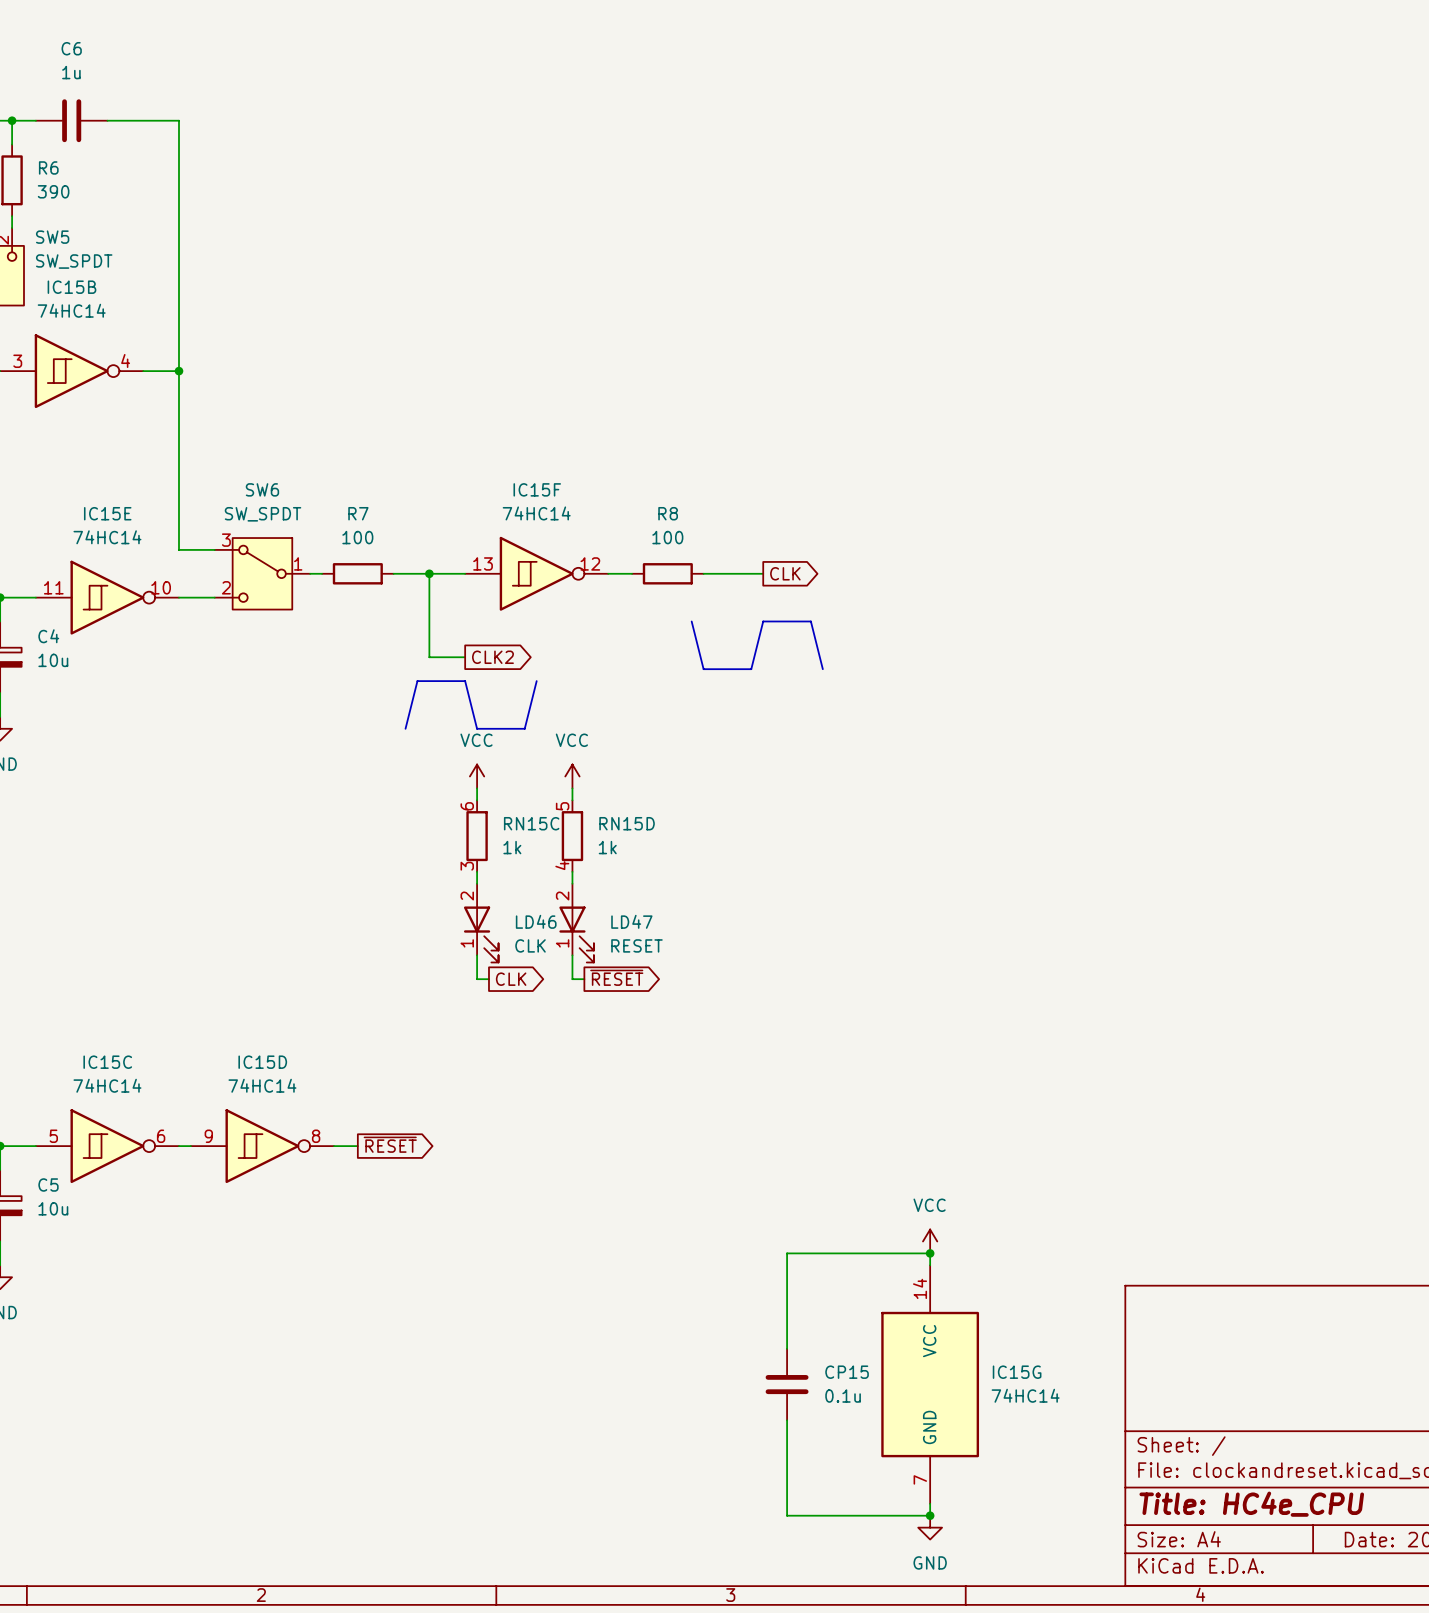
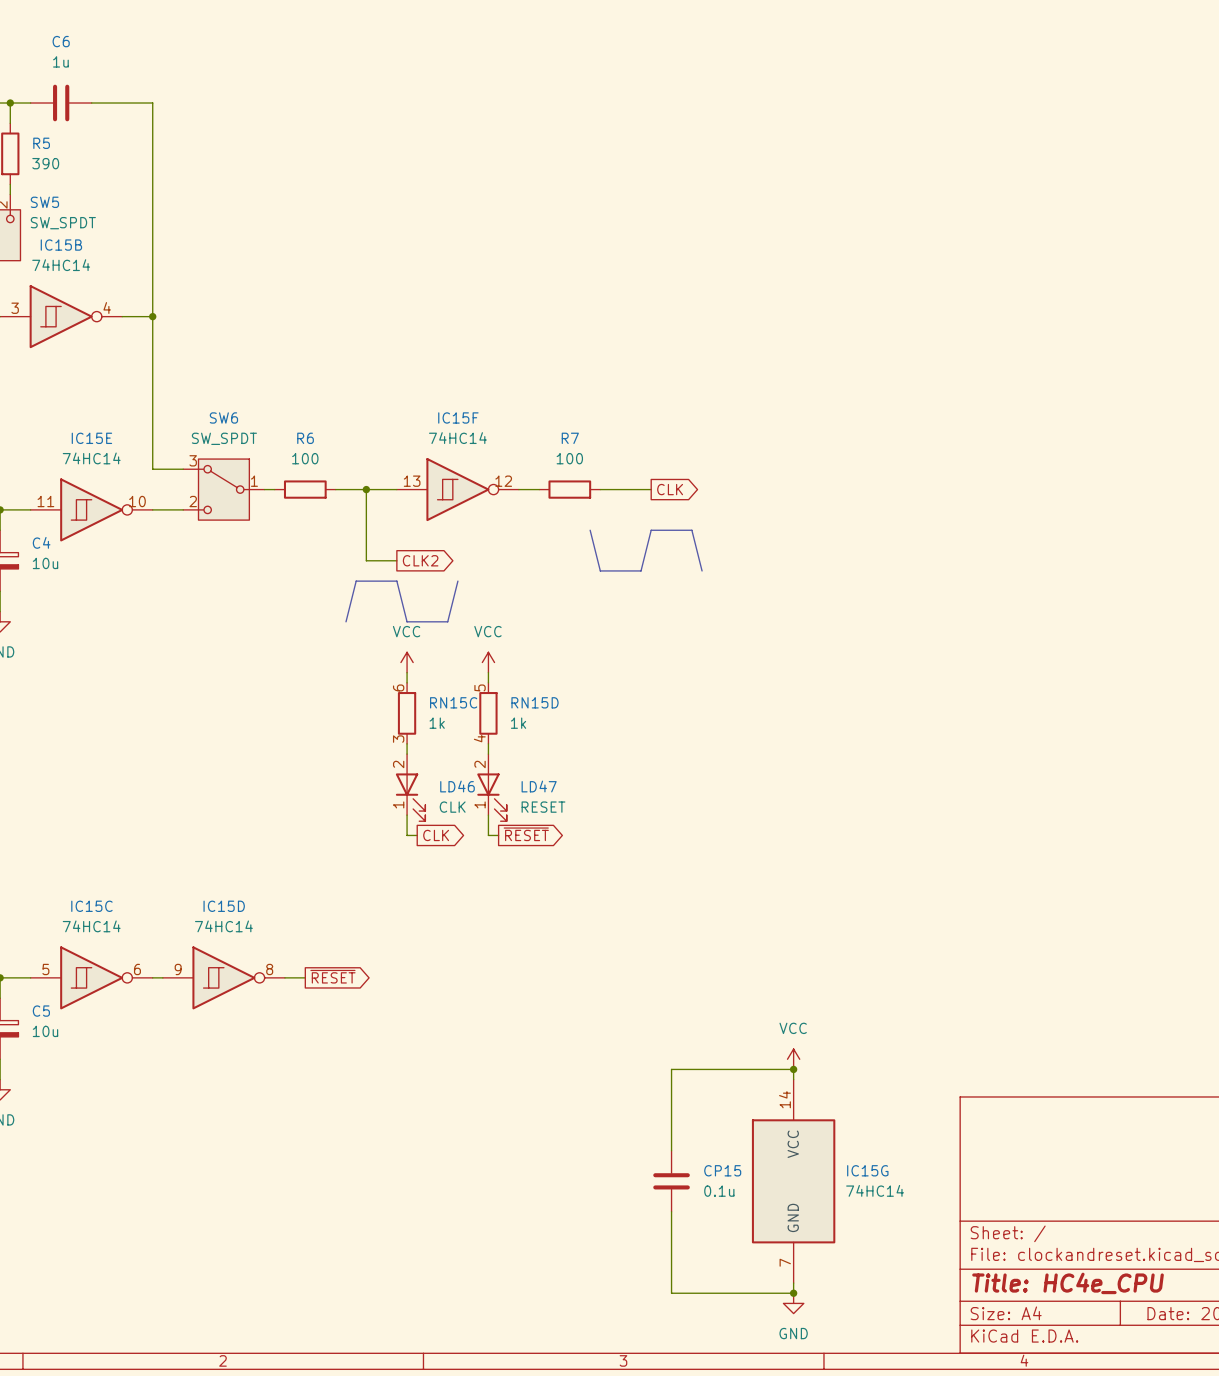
R6 name: R6 (48, 167) -> R5 (41, 143)
R7 name: R7 (358, 513) -> R6 (305, 438)
R8 name: R8 (668, 513) -> R7 (570, 438)

